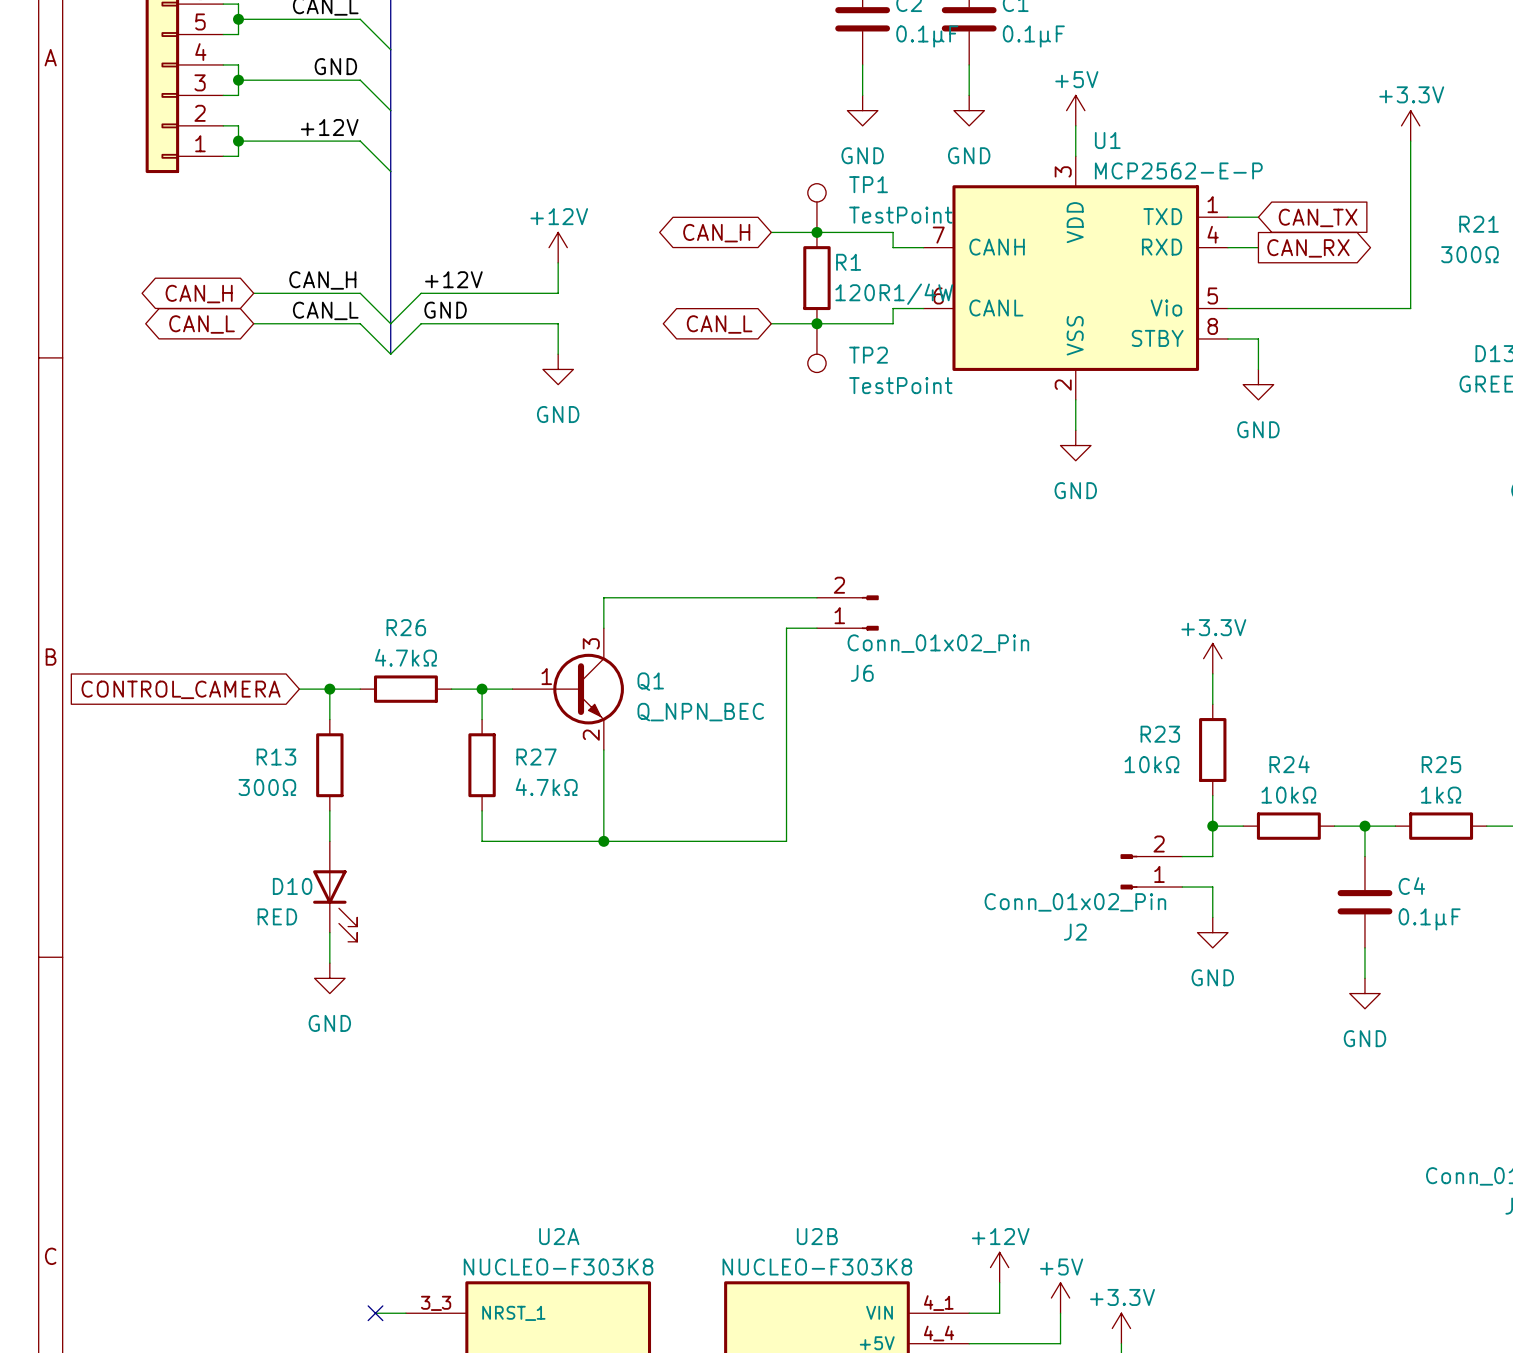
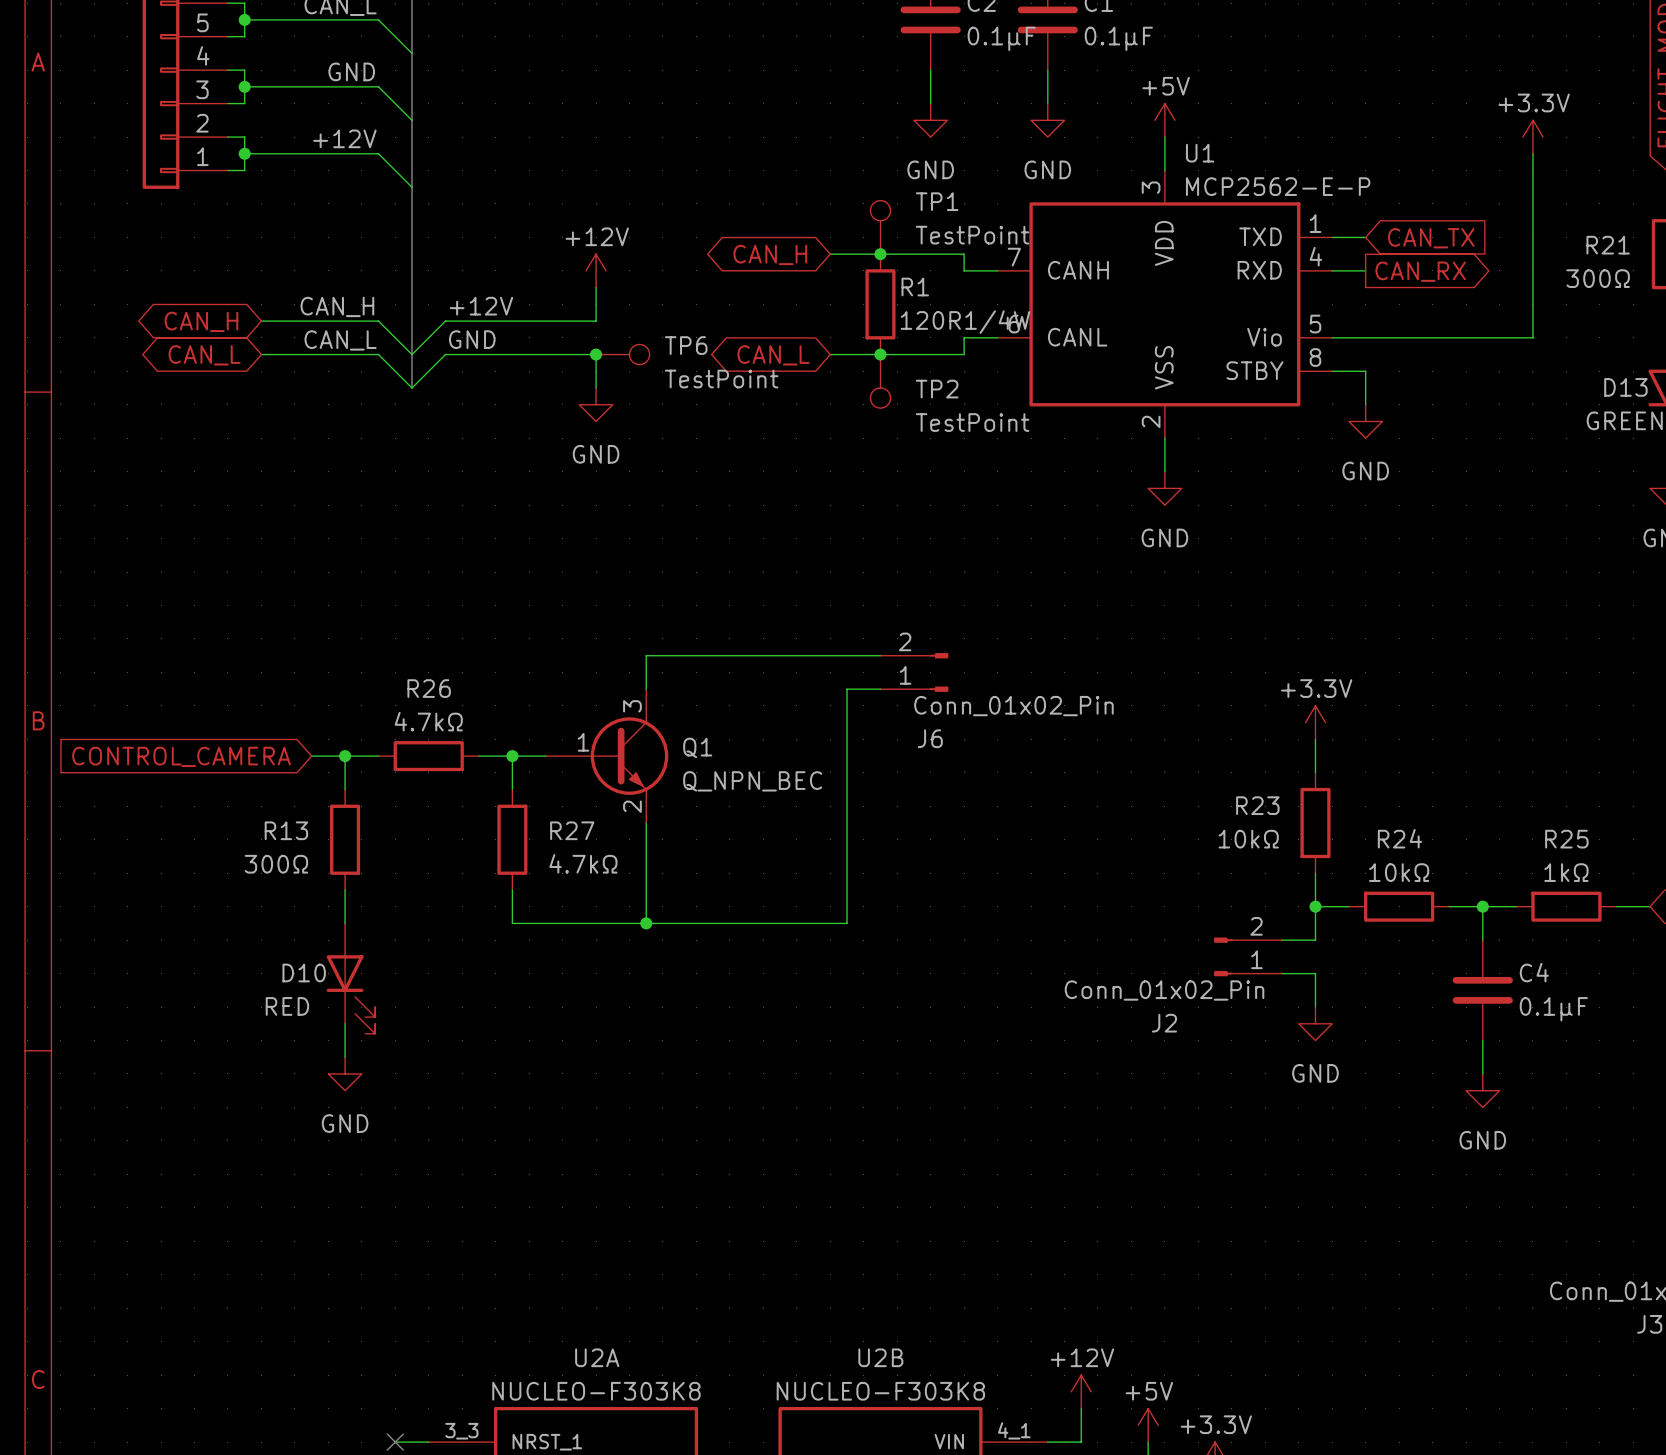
junction: none -> (596, 354)
TP6: none -> TestPoint (622, 354)

